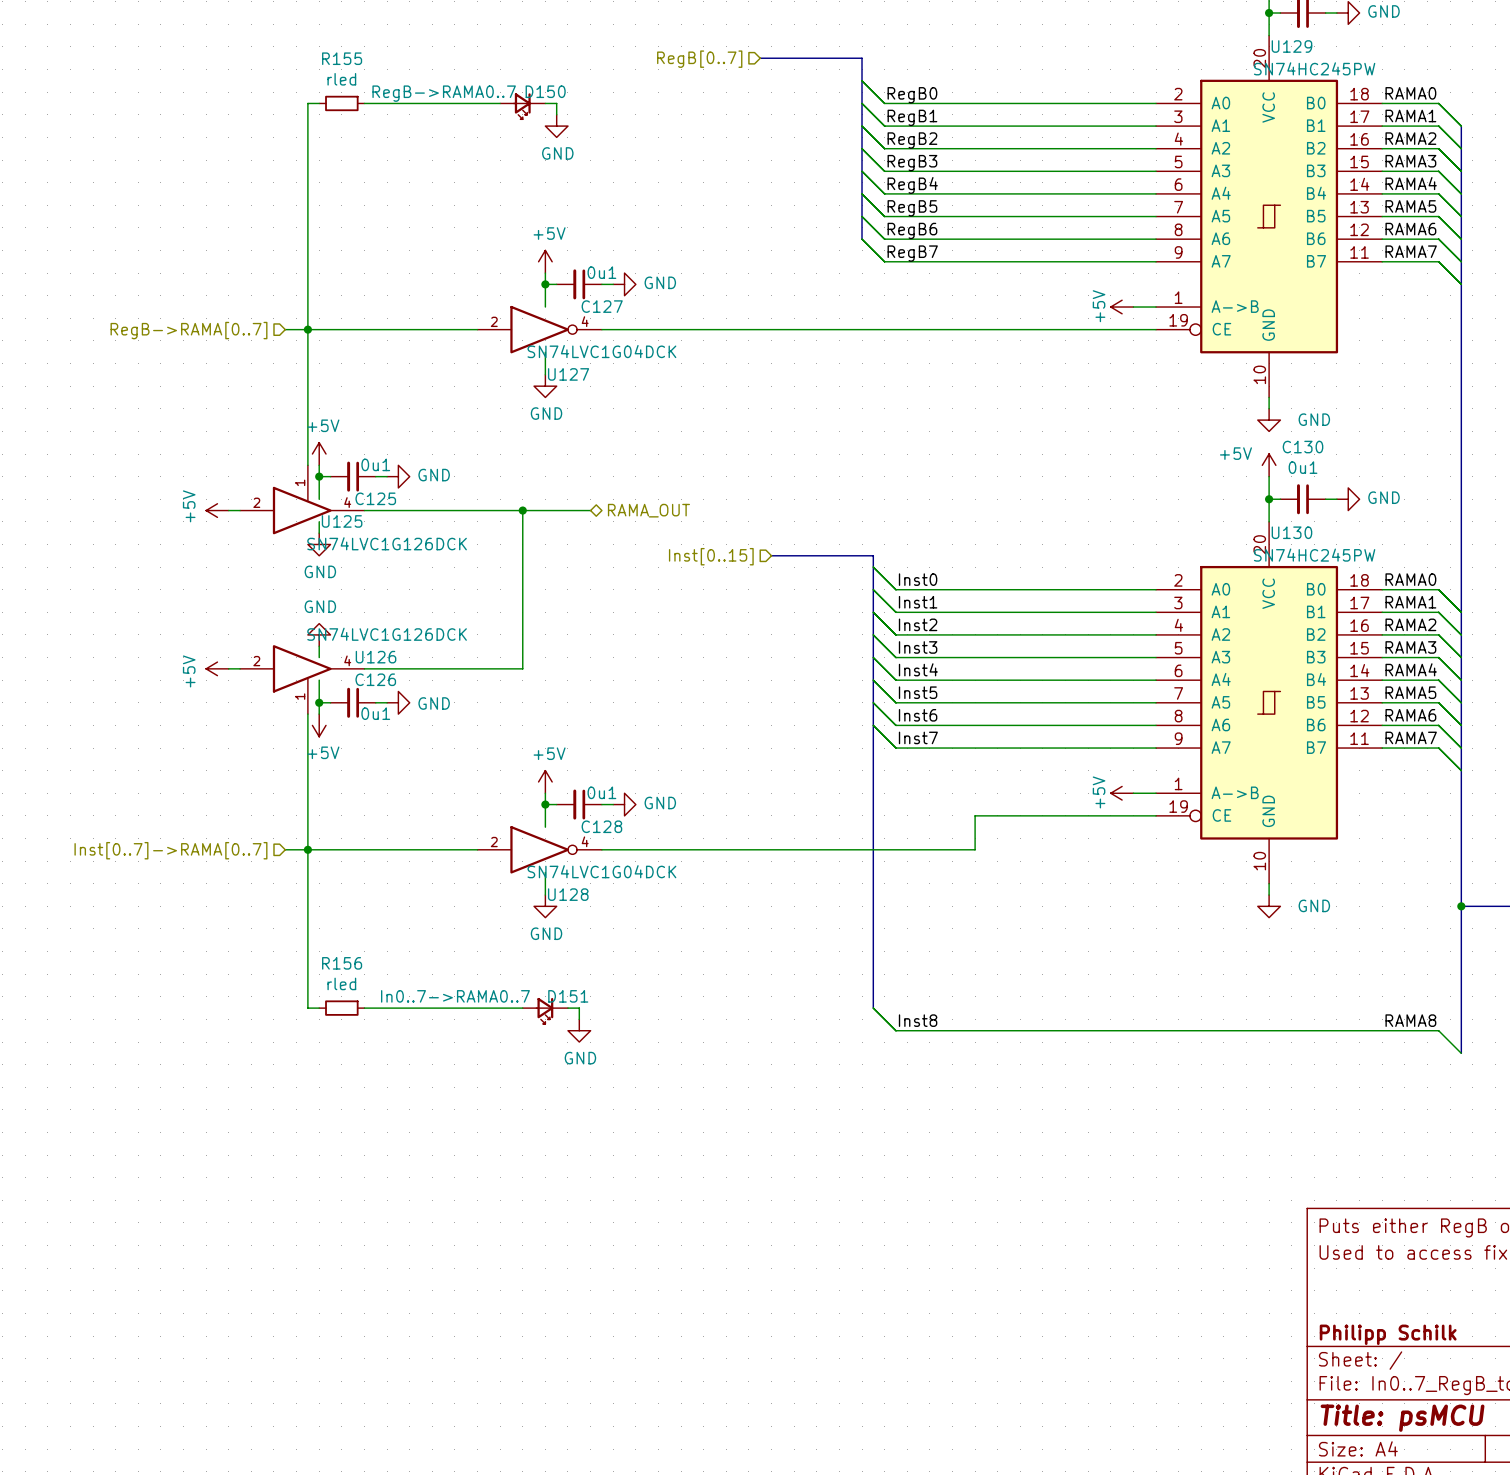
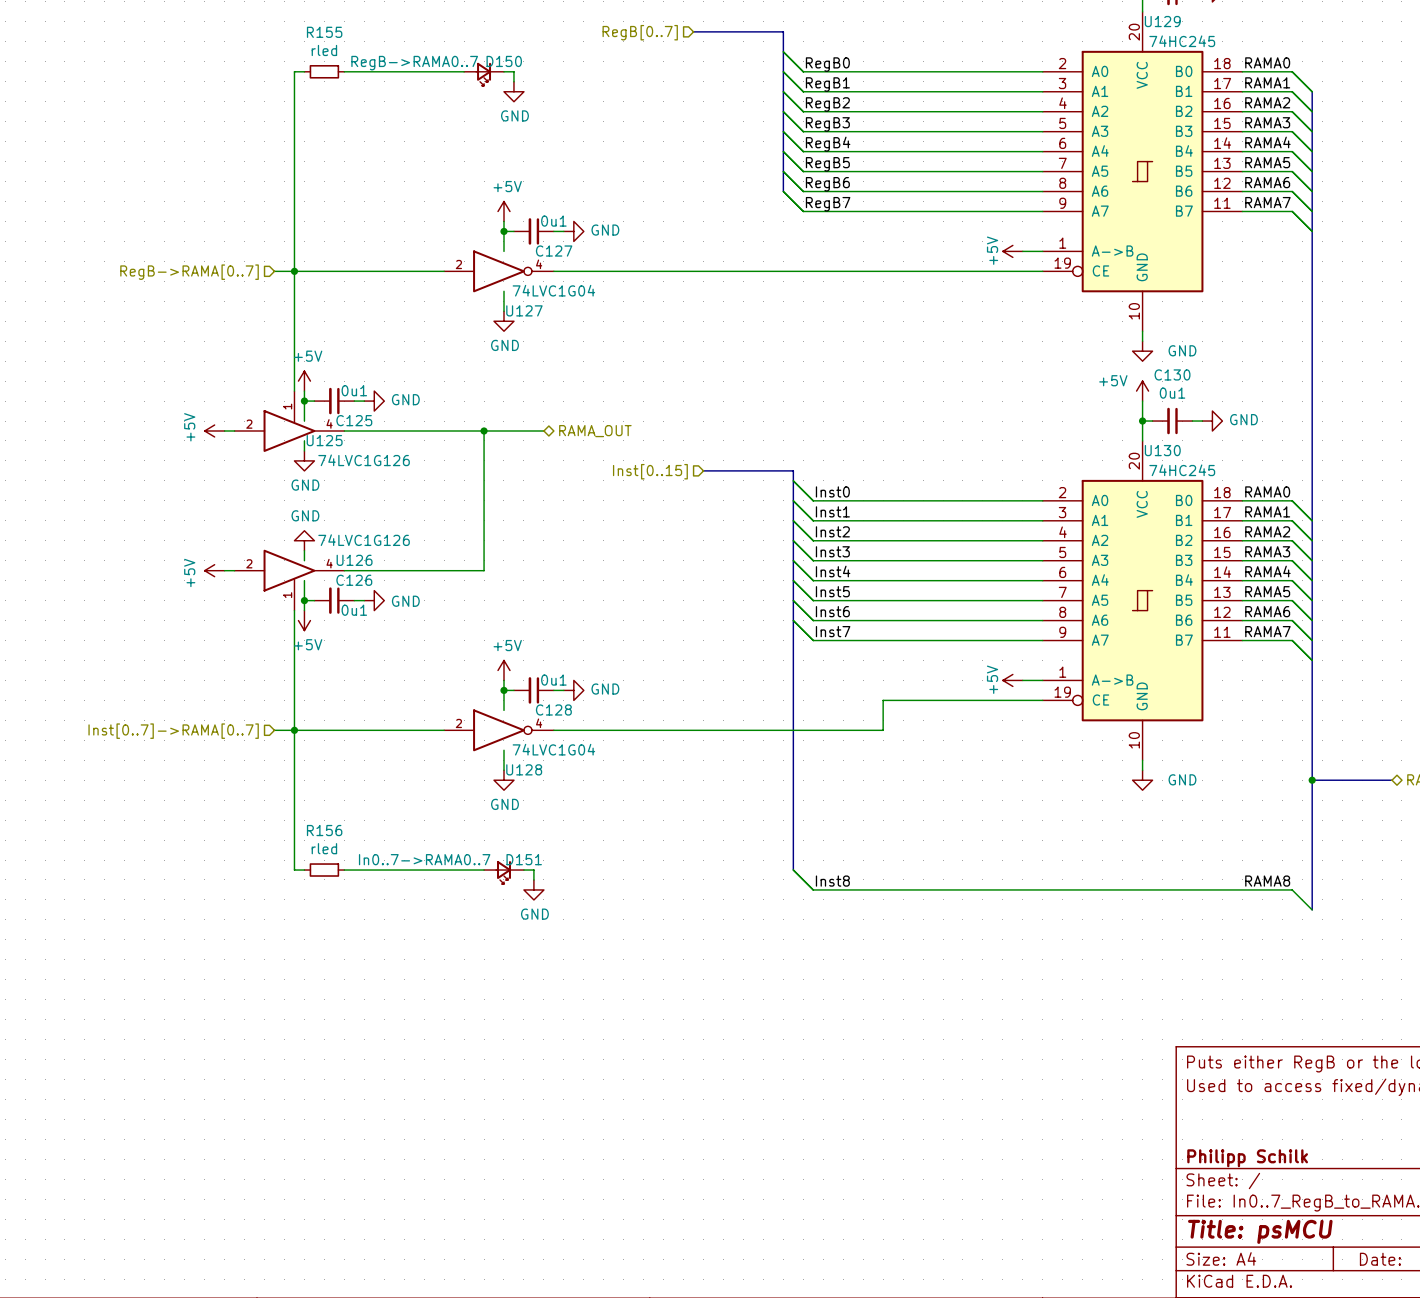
U129 value: SN74HC245PW (1314, 68) -> 74HC245 (1182, 41)
U127 value: SN74LVC1G04DCK (601, 351) -> 74LVC1G04 (553, 290)
U125 value: SN74LVC1G126DCK (387, 543) -> 74LVC1G126 (364, 460)
U130 value: SN74HC245PW (1314, 555) -> 74HC245 (1182, 470)
U126 value: SN74LVC1G126DCK (387, 634) -> 74LVC1G126 (364, 540)
U128 value: SN74LVC1G04DCK (601, 871) -> 74LVC1G04 (553, 749)

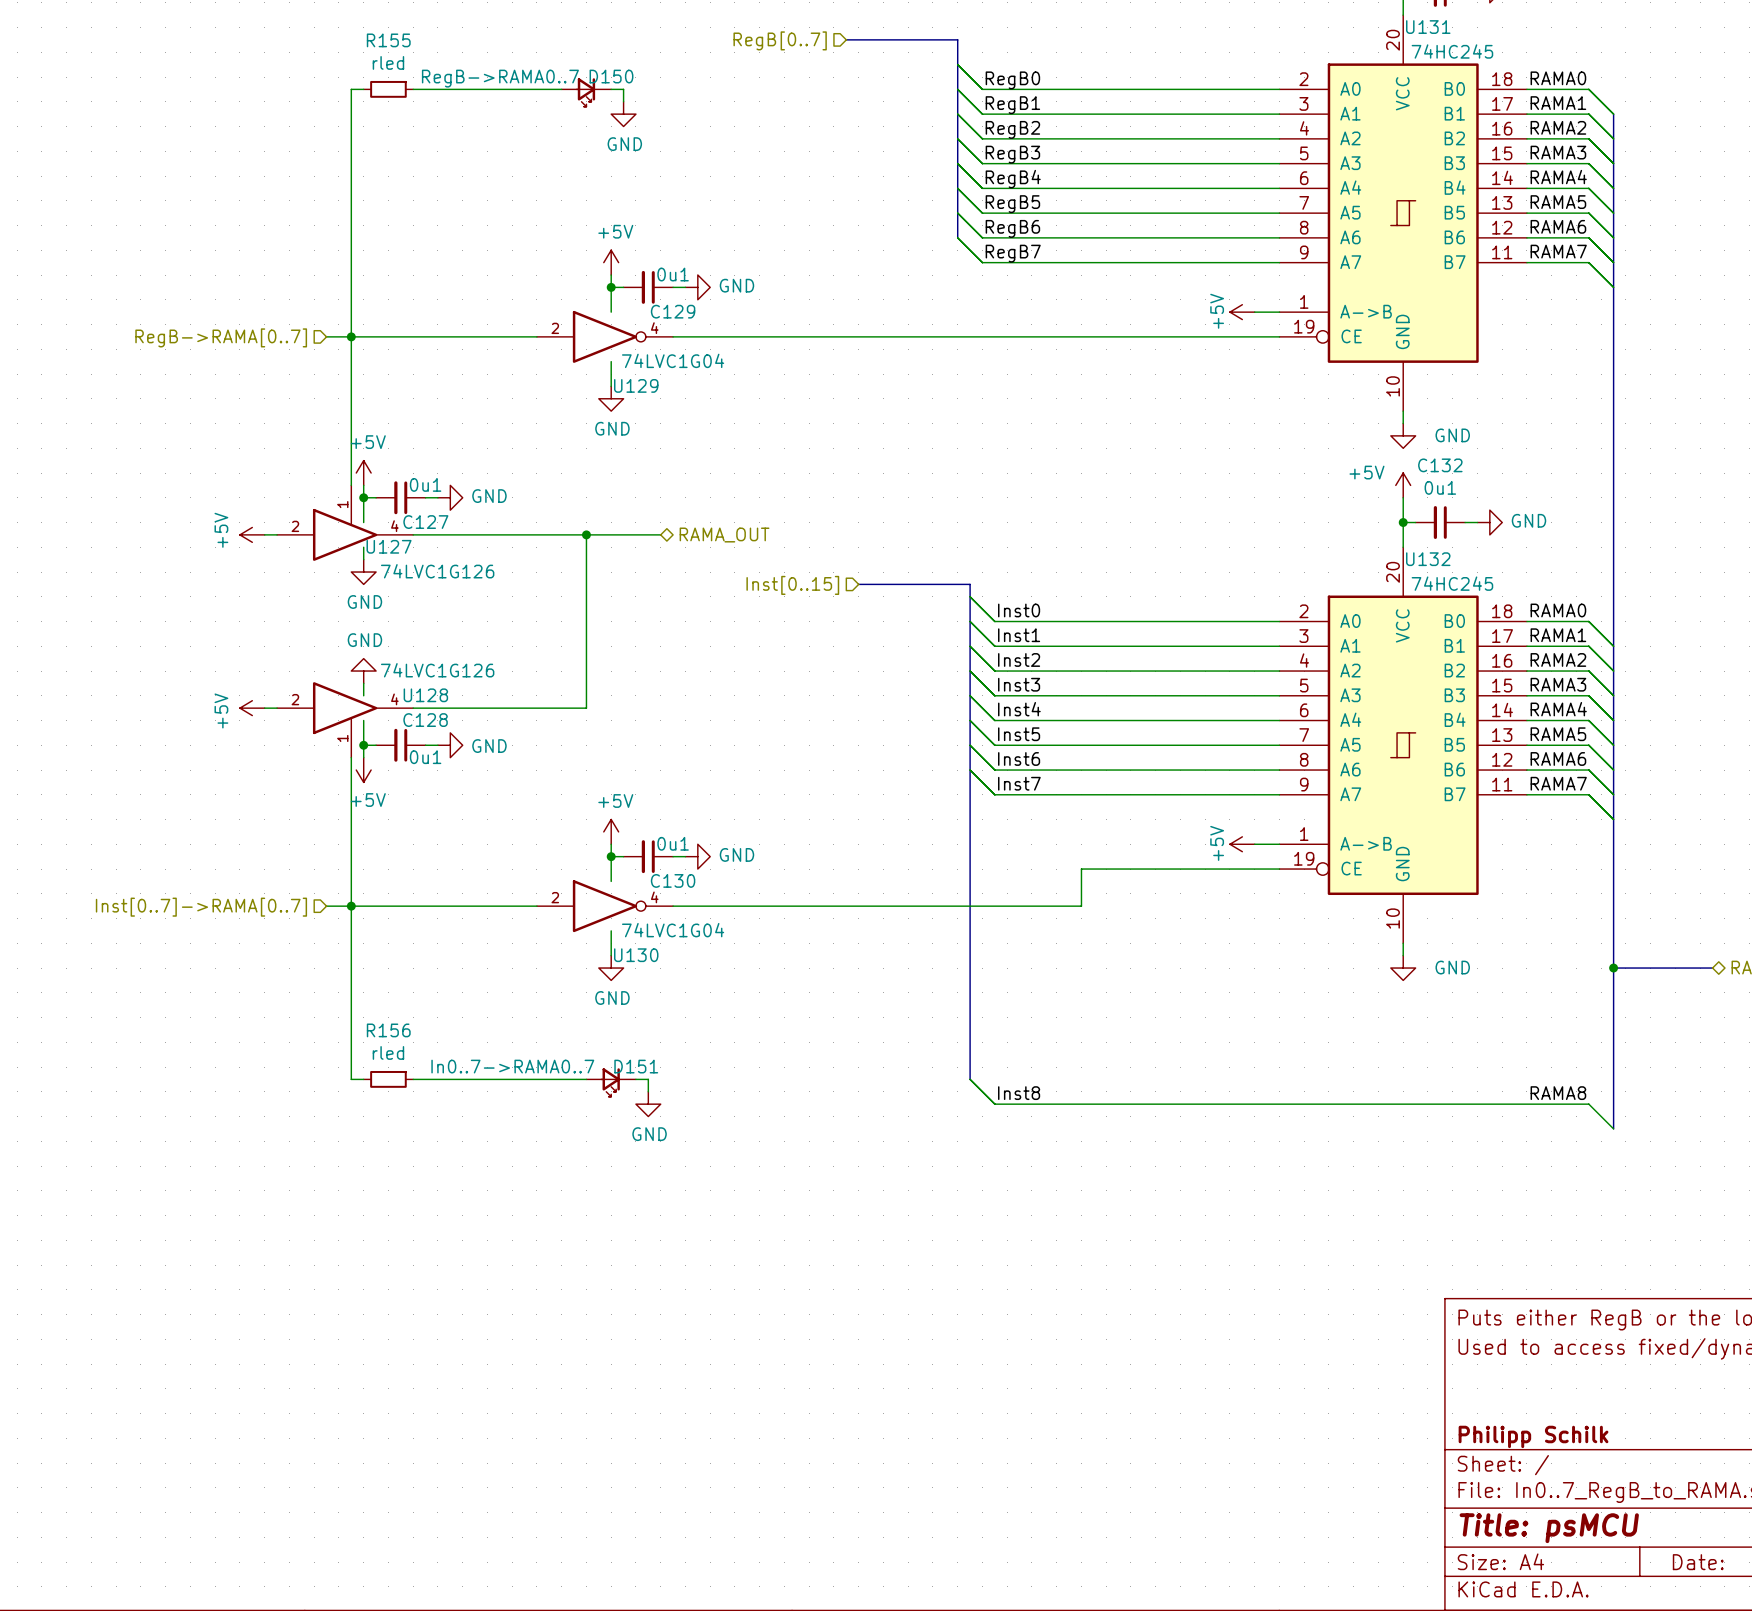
U129 name: U129 (1162, 21) -> U131 (1428, 27)
C127 name: C127 (554, 251) -> C129 (673, 311)
U127 name: U127 (524, 310) -> U129 (636, 385)
C130 name: C130 (1172, 374) -> C132 (1440, 465)
C125 name: C125 (354, 420) -> C127 (425, 522)
U125 name: U125 (324, 440) -> U127 (389, 546)
U130 name: U130 (1162, 450) -> U132 (1428, 559)
U126 name: U126 (354, 560) -> U128 (425, 695)
C126 name: C126 (354, 580) -> C128 (425, 720)
C128 name: C128 (553, 710) -> C130 (673, 880)
U128 name: U128 (524, 769) -> U130 (636, 955)

